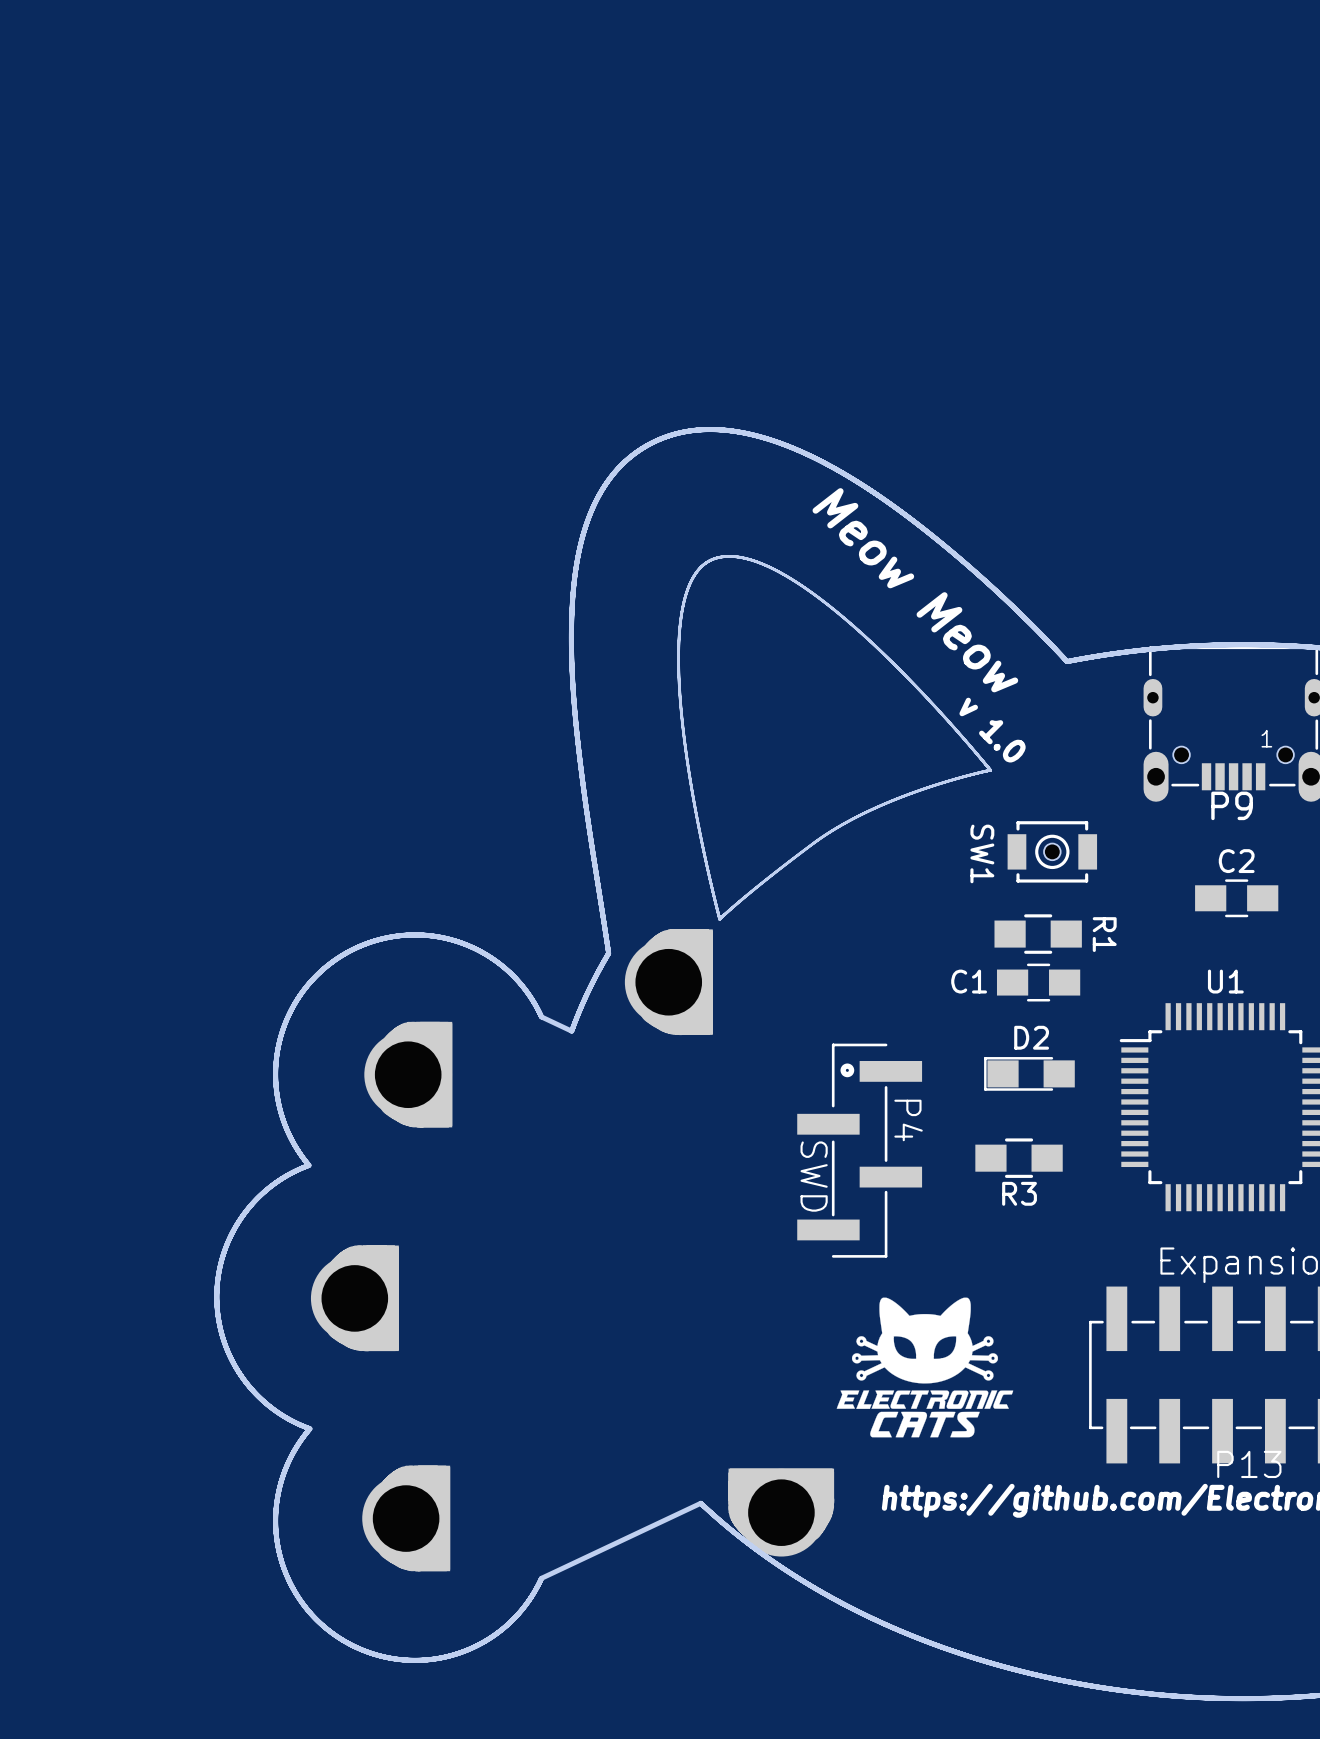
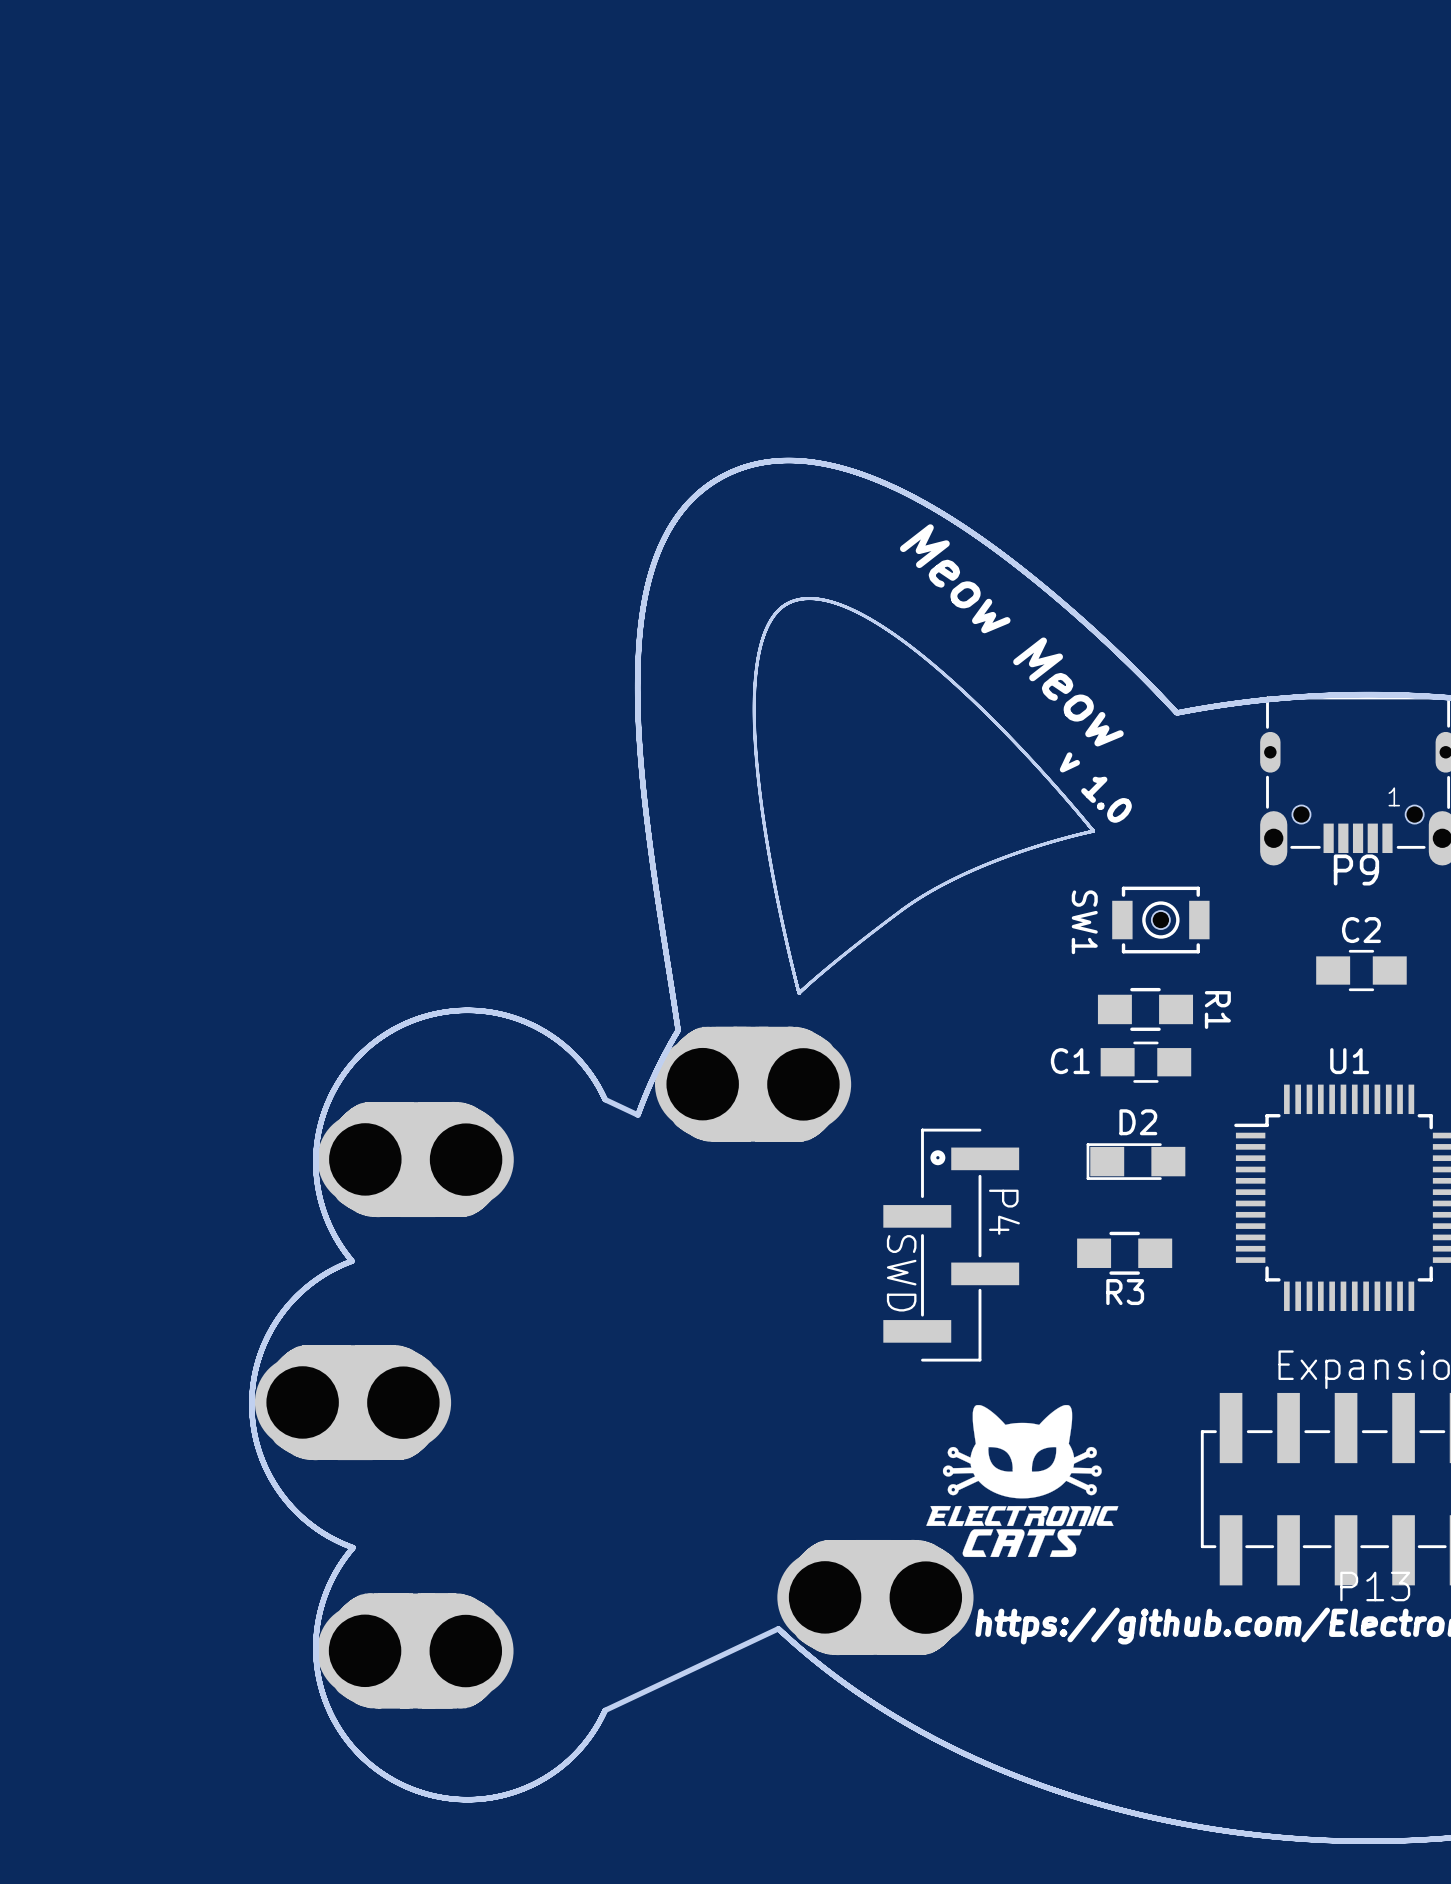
part: (668, 982) -> none
part: none -> (753, 1084)
part: none -> (415, 1159)
part: (408, 1074) -> none
part: none -> (353, 1402)
part: (354, 1298) -> none
part: none -> (875, 1597)
part: (781, 1512) -> none
part: (406, 1518) -> none
part: none -> (415, 1650)

